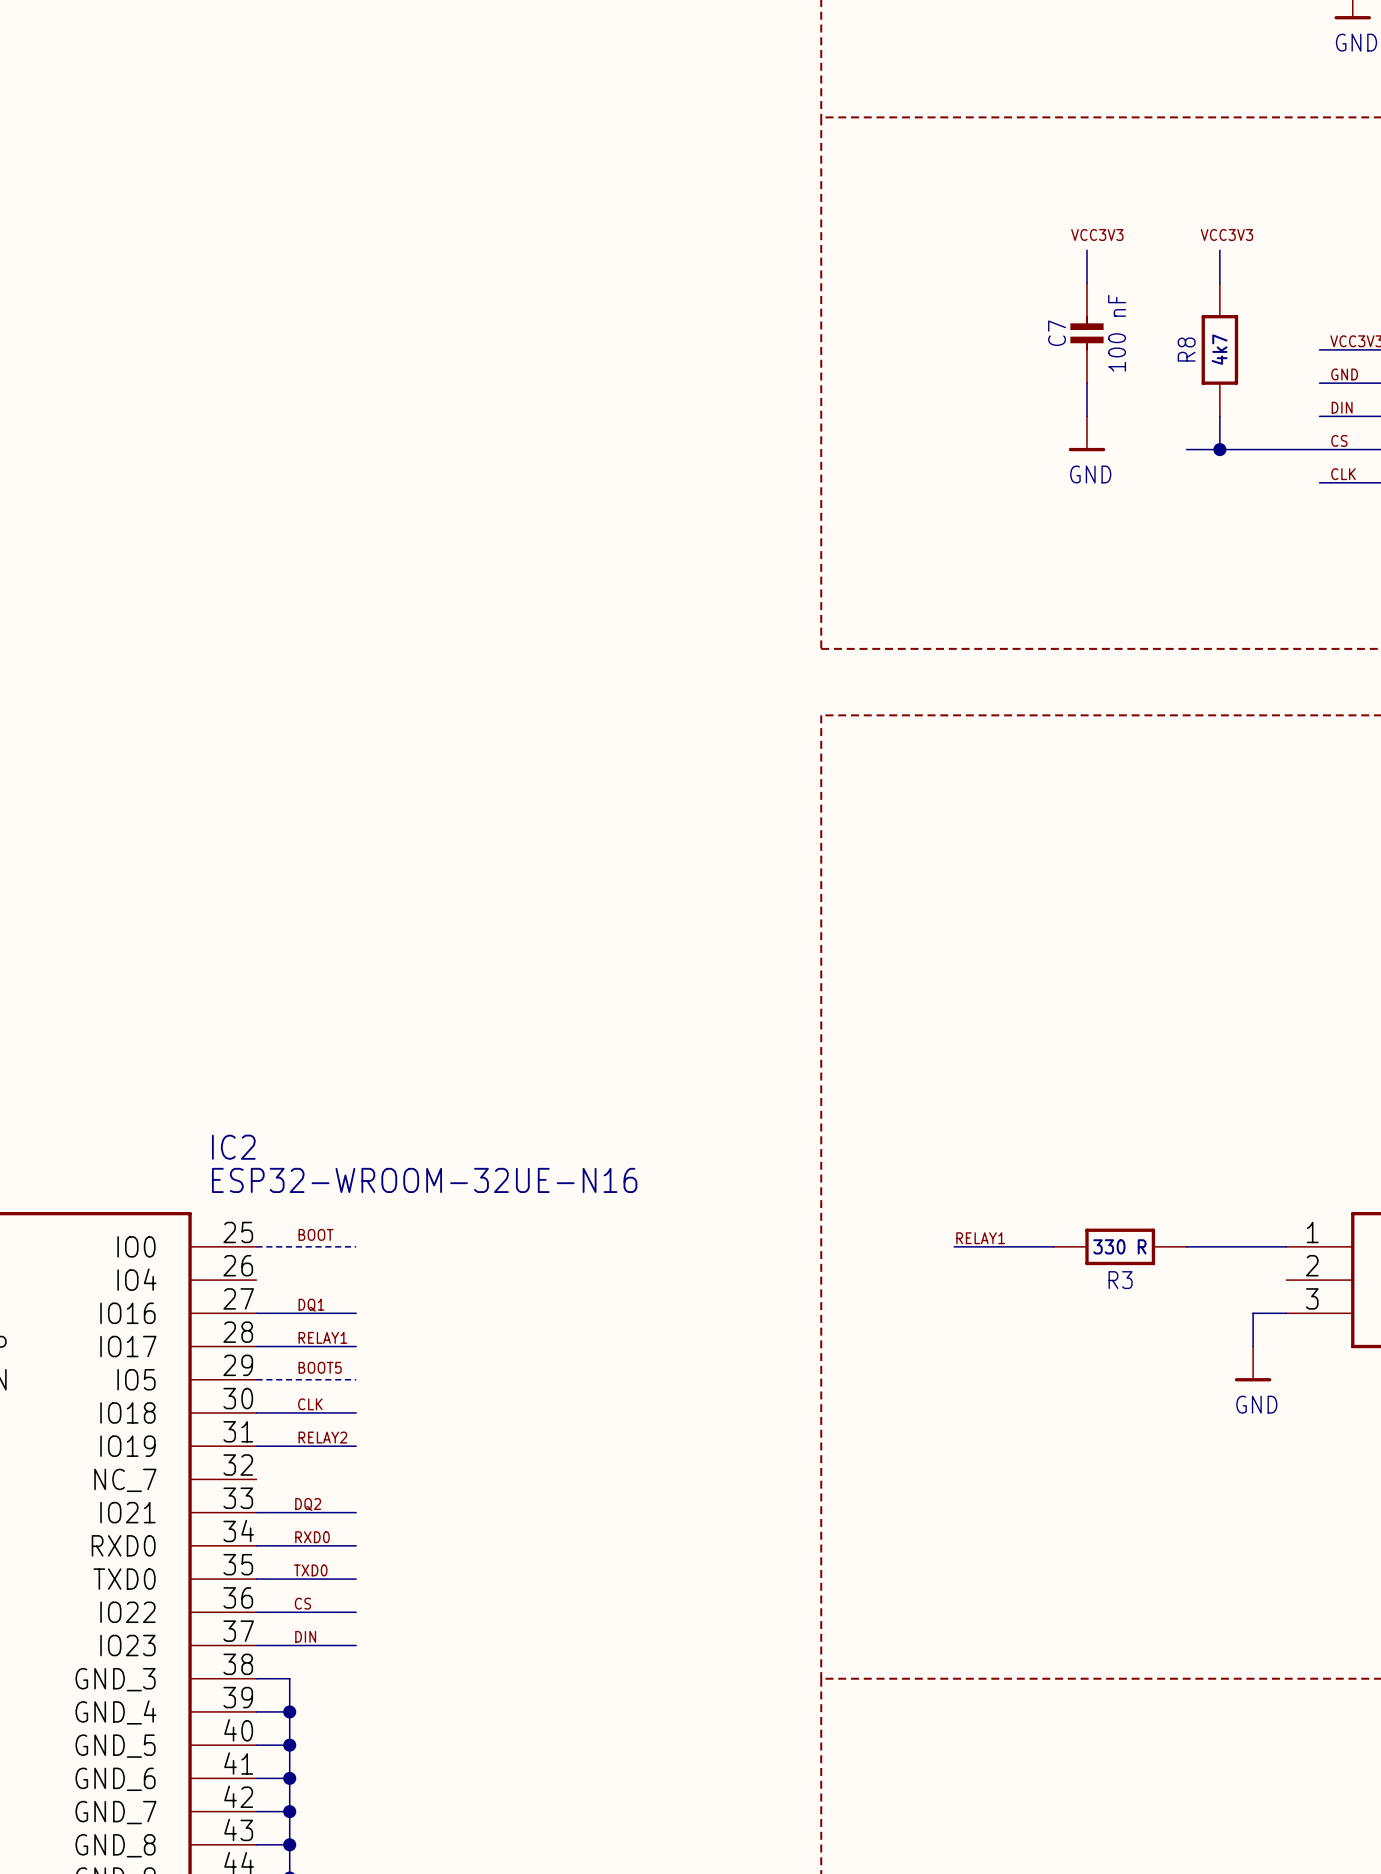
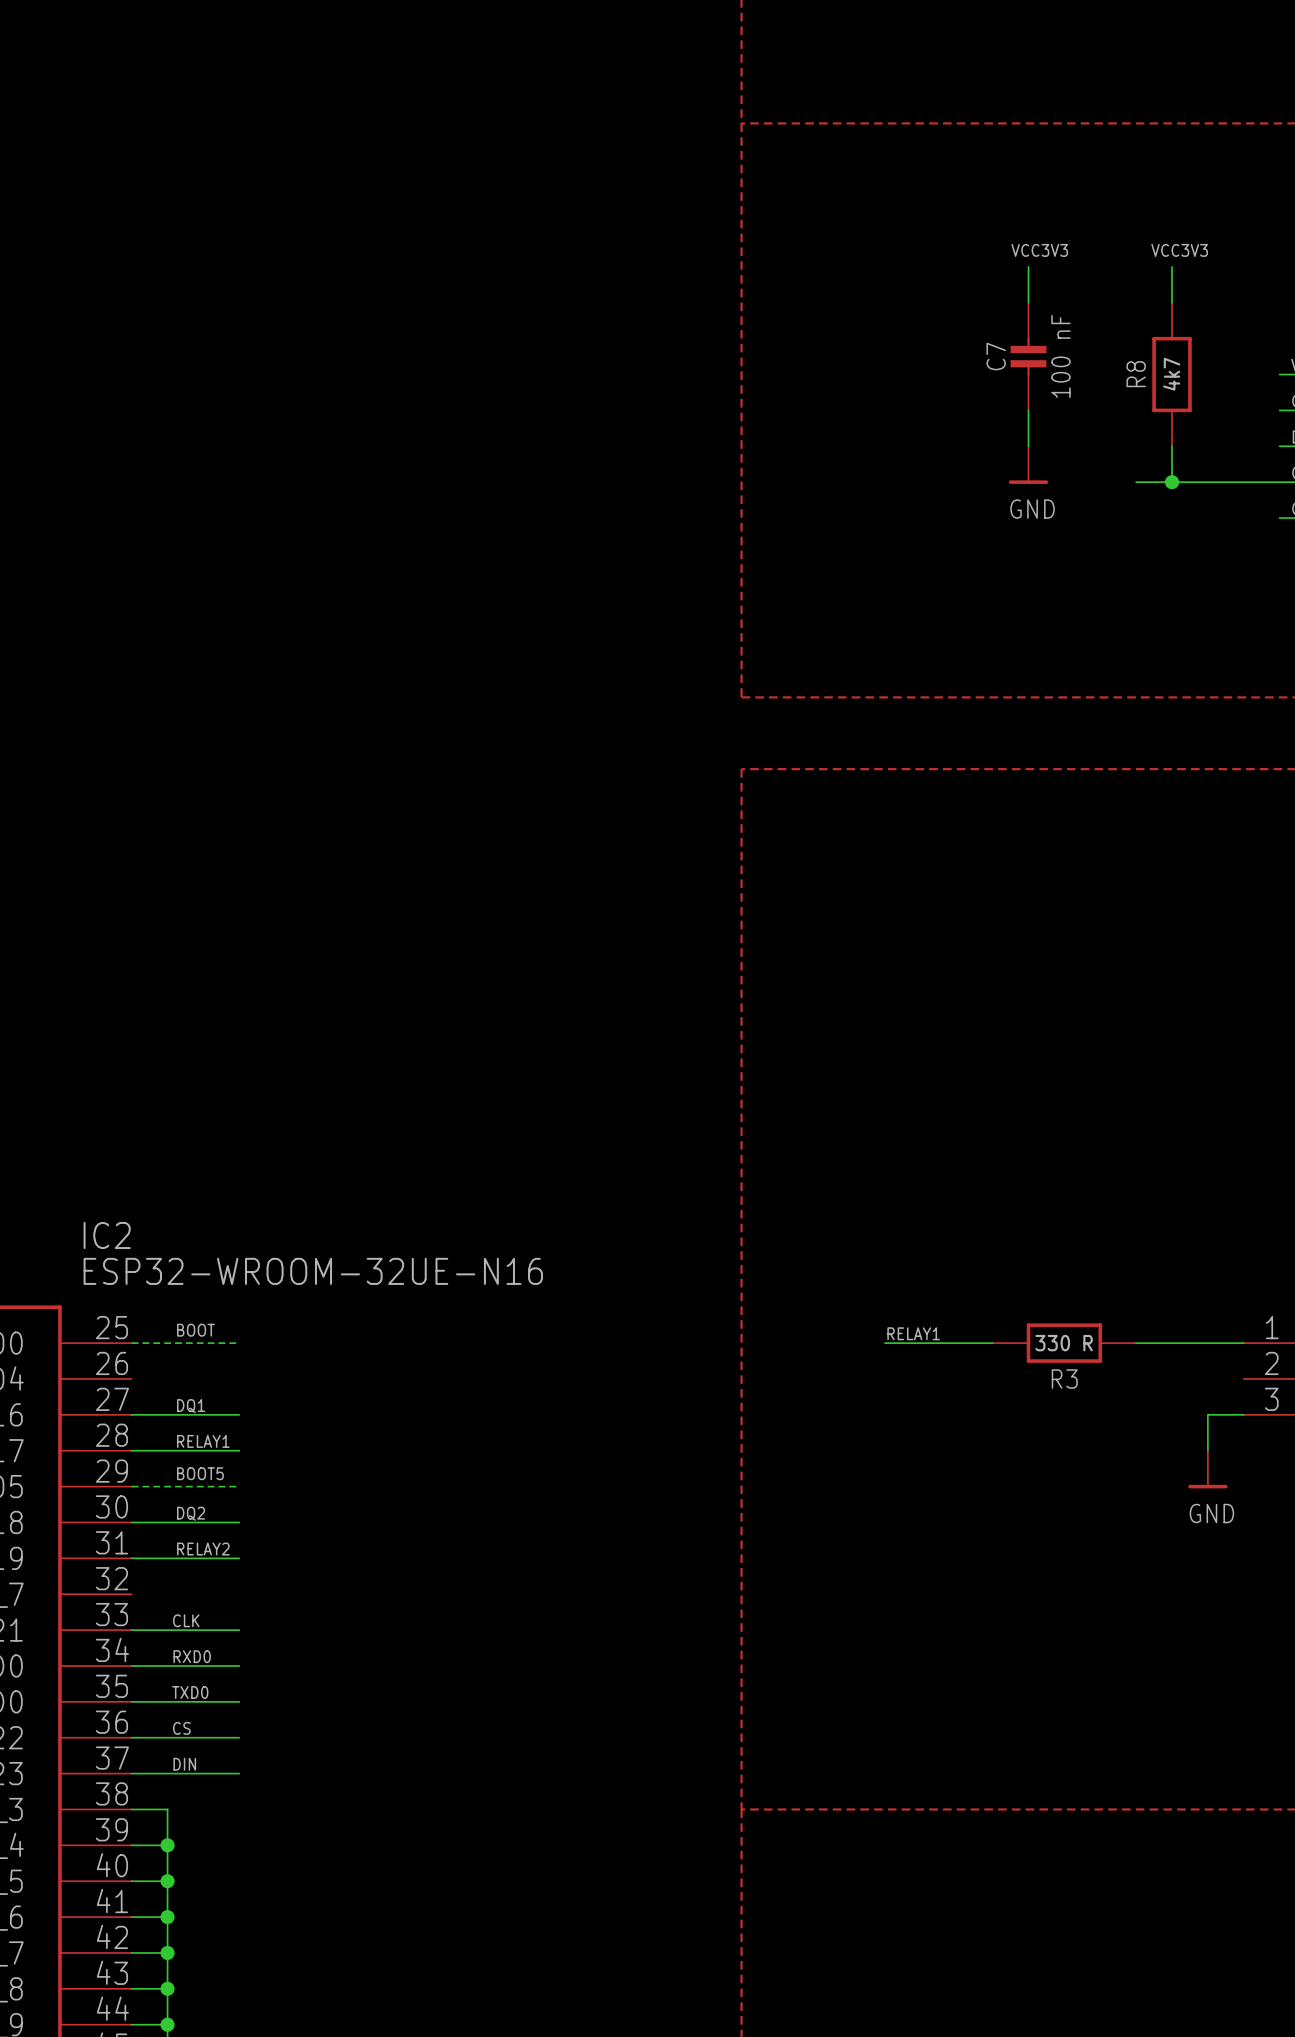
label: CLK (310, 1404) -> DQ2 (191, 1513)
label: DQ2 (308, 1504) -> CLK (186, 1620)

